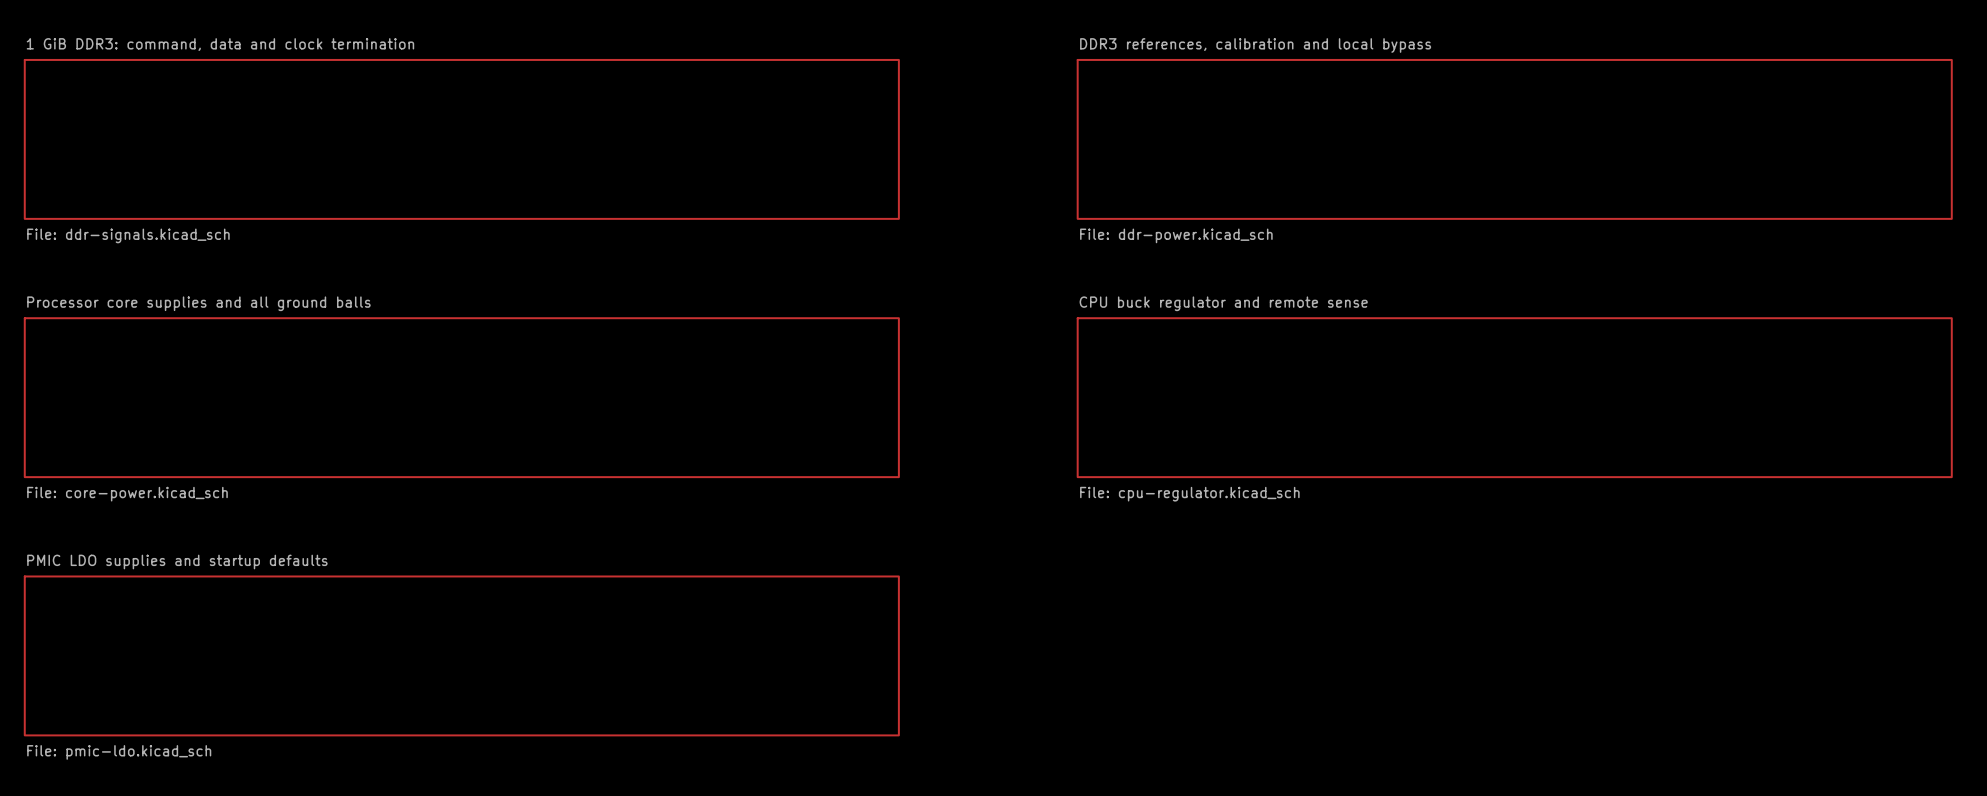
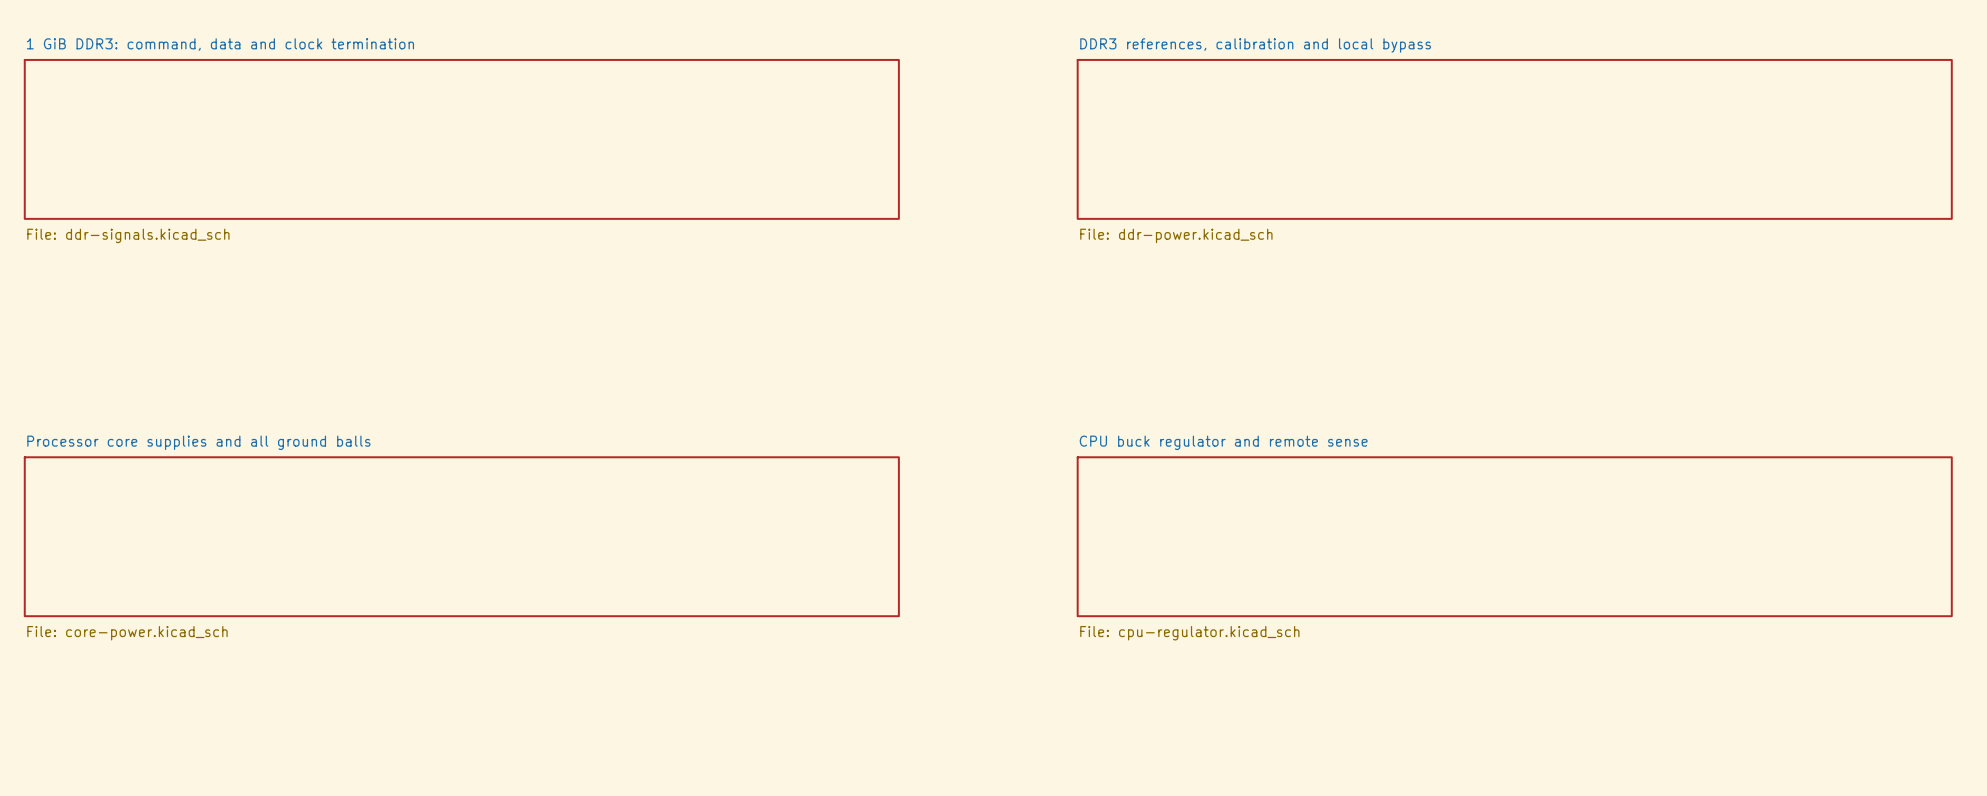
sheet Processor core supplies and all ground balls position: (461, 397) -> (461, 536)
sheet CPU buck regulator and remote sense position: (1514, 397) -> (1514, 536)
sheet PMIC LDO supplies and startup defaults: File: pmic-ldo.kicad_sch (461, 655) -> none

